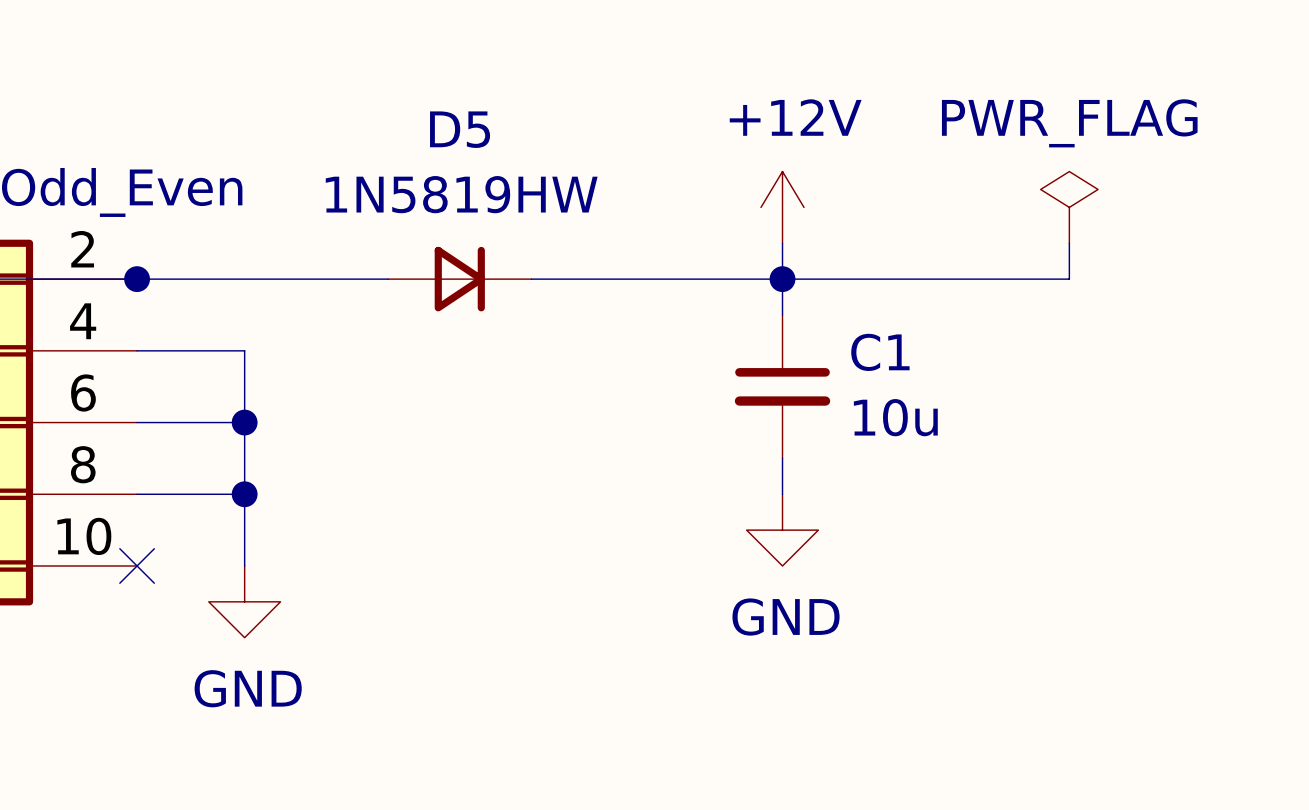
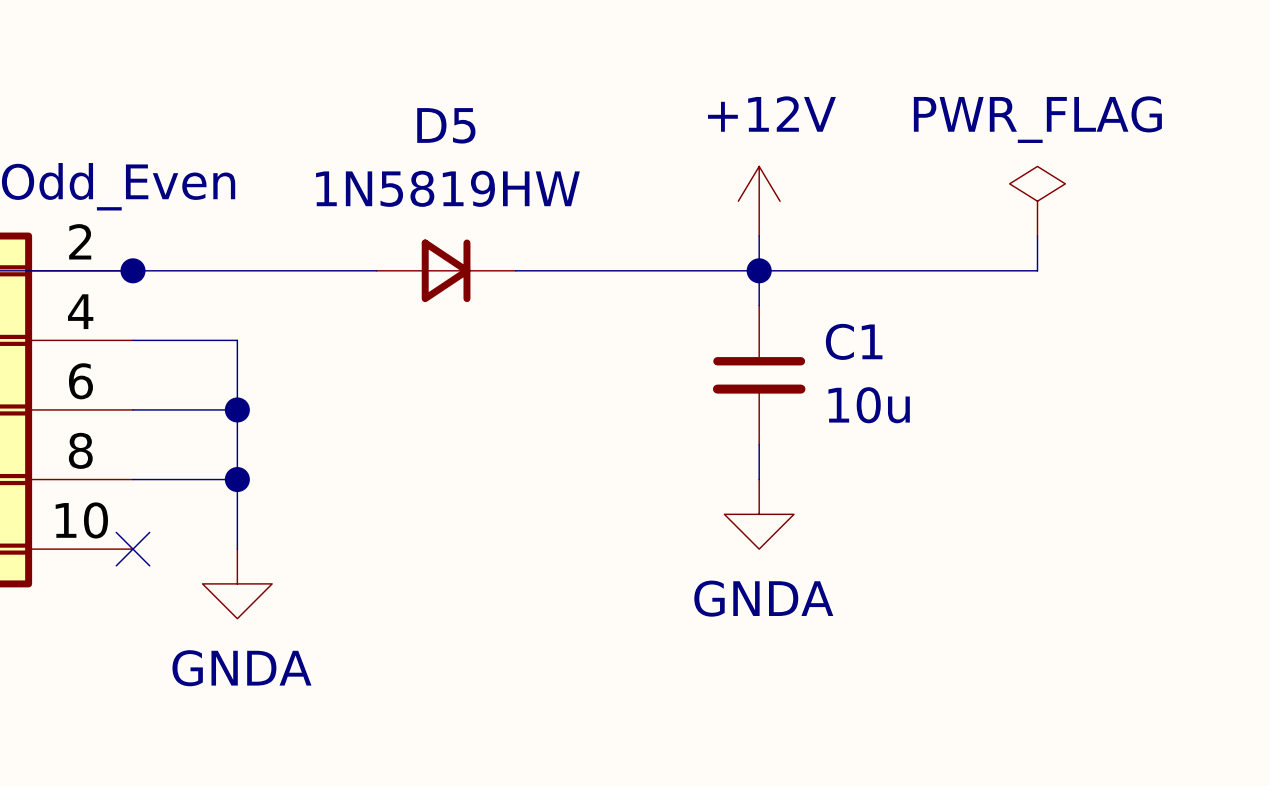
power symbol: GND (782, 530) -> GNDA (759, 514)
power symbol: GND (244, 601) -> GNDA (237, 583)

